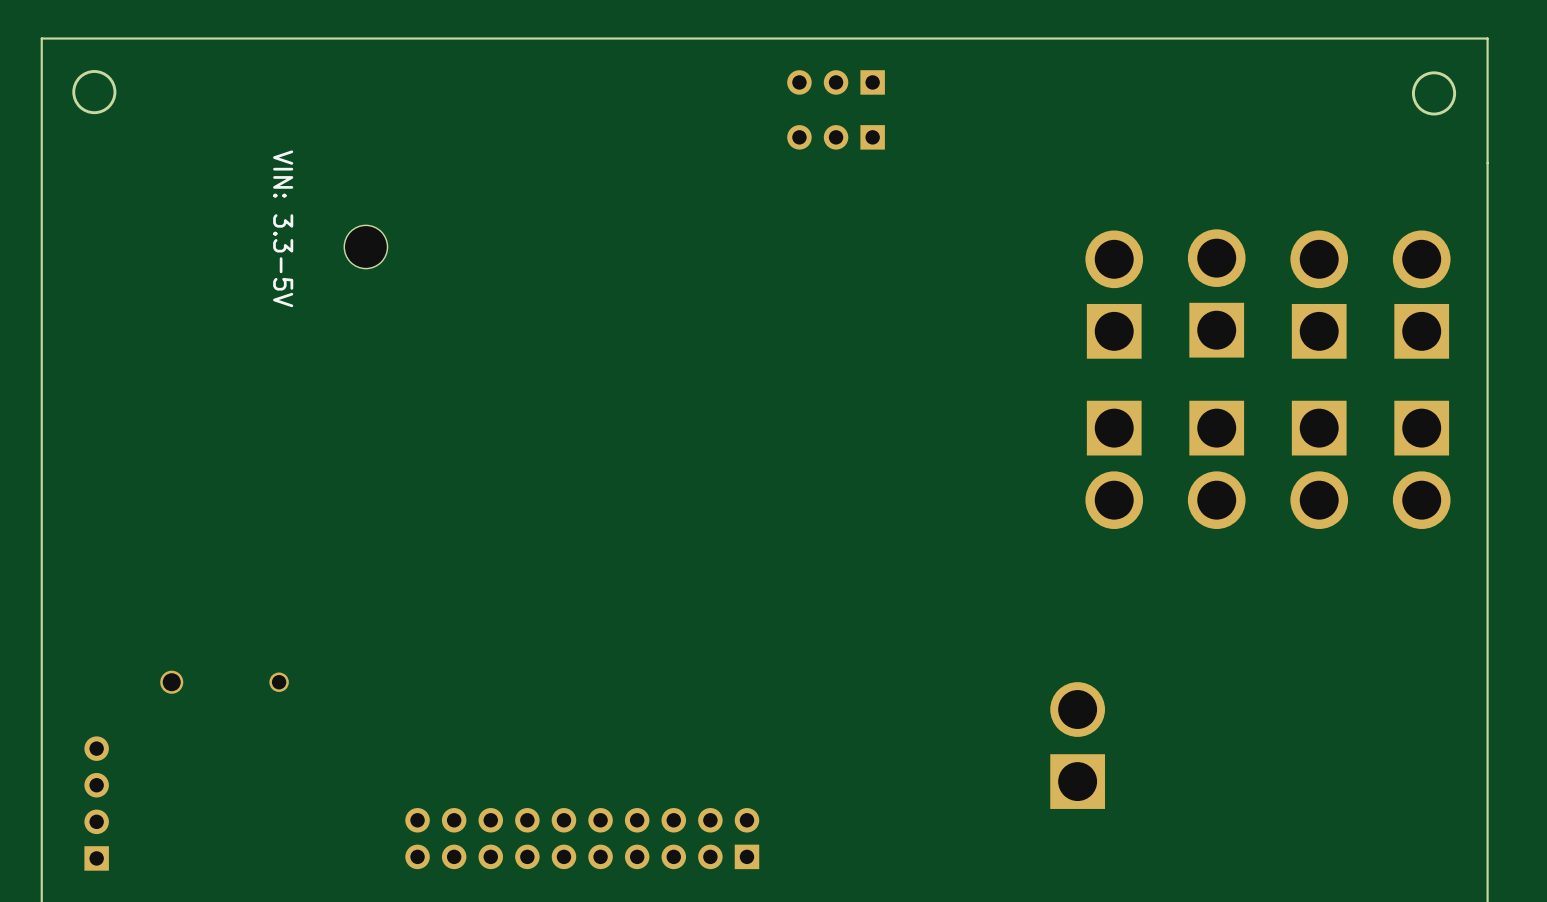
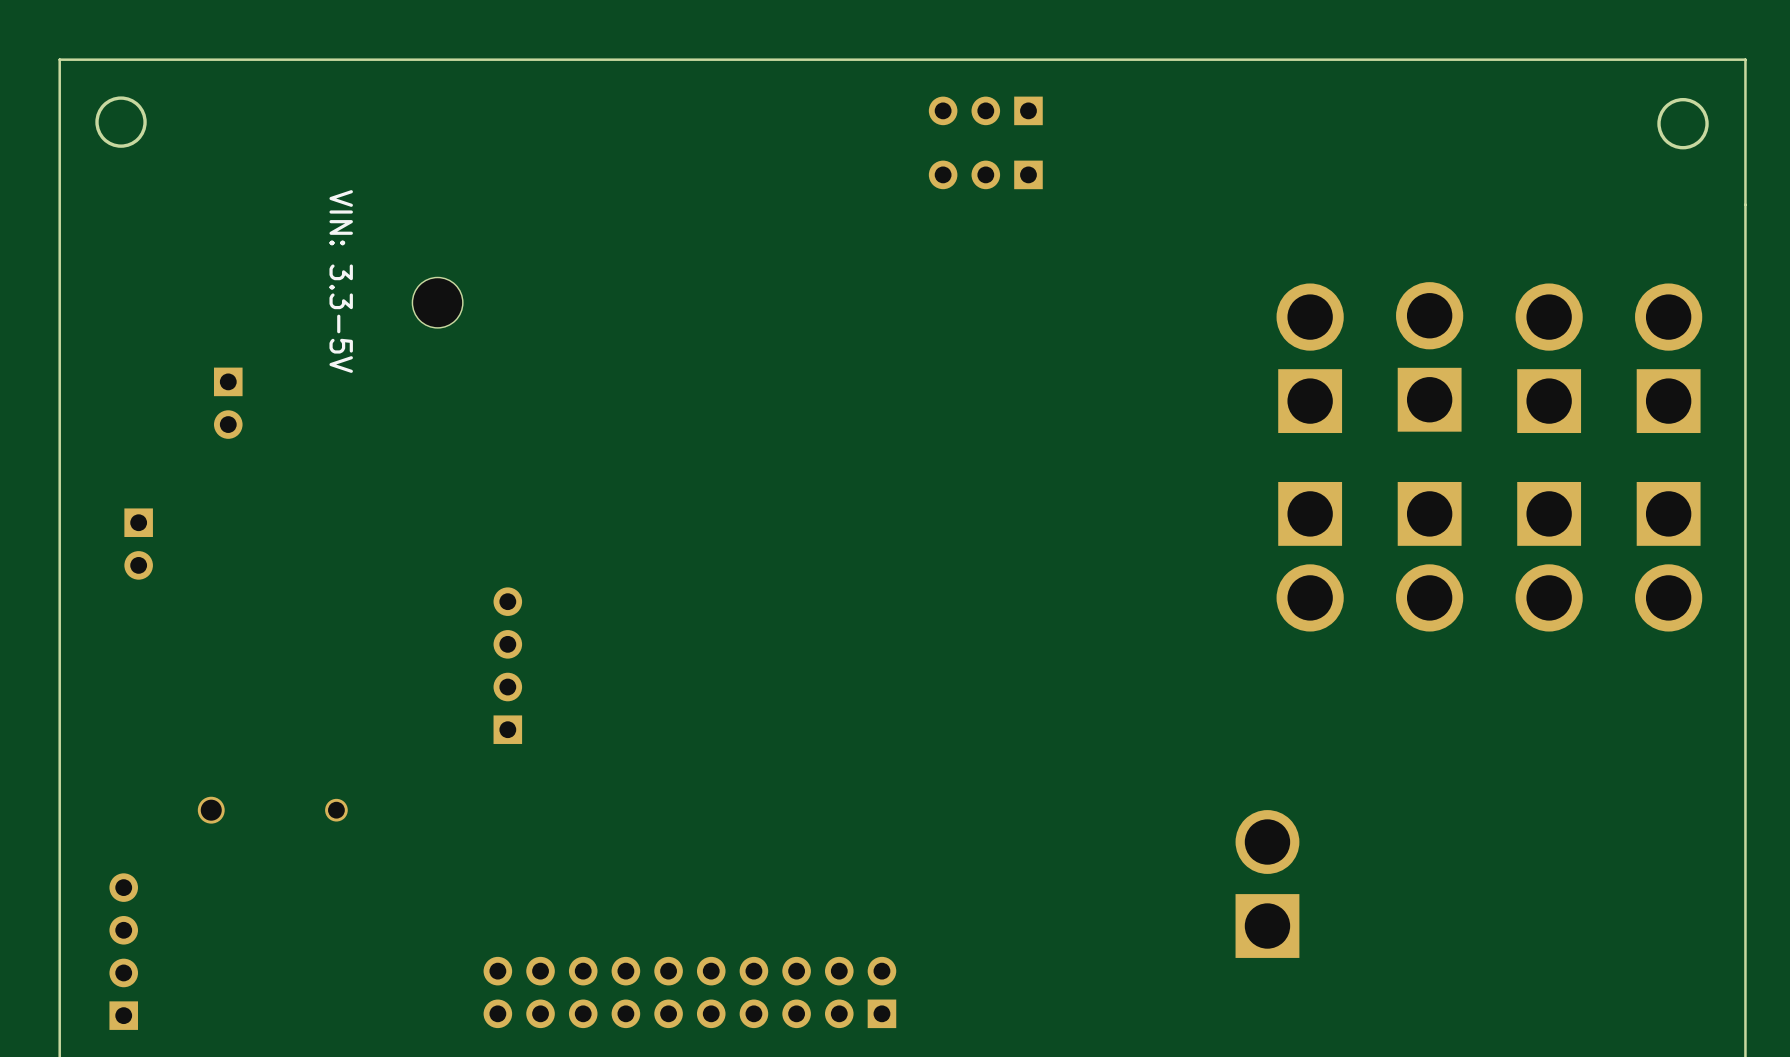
part: none -> (228, 403)
part: none -> (138, 544)
part: none -> (507, 665)

